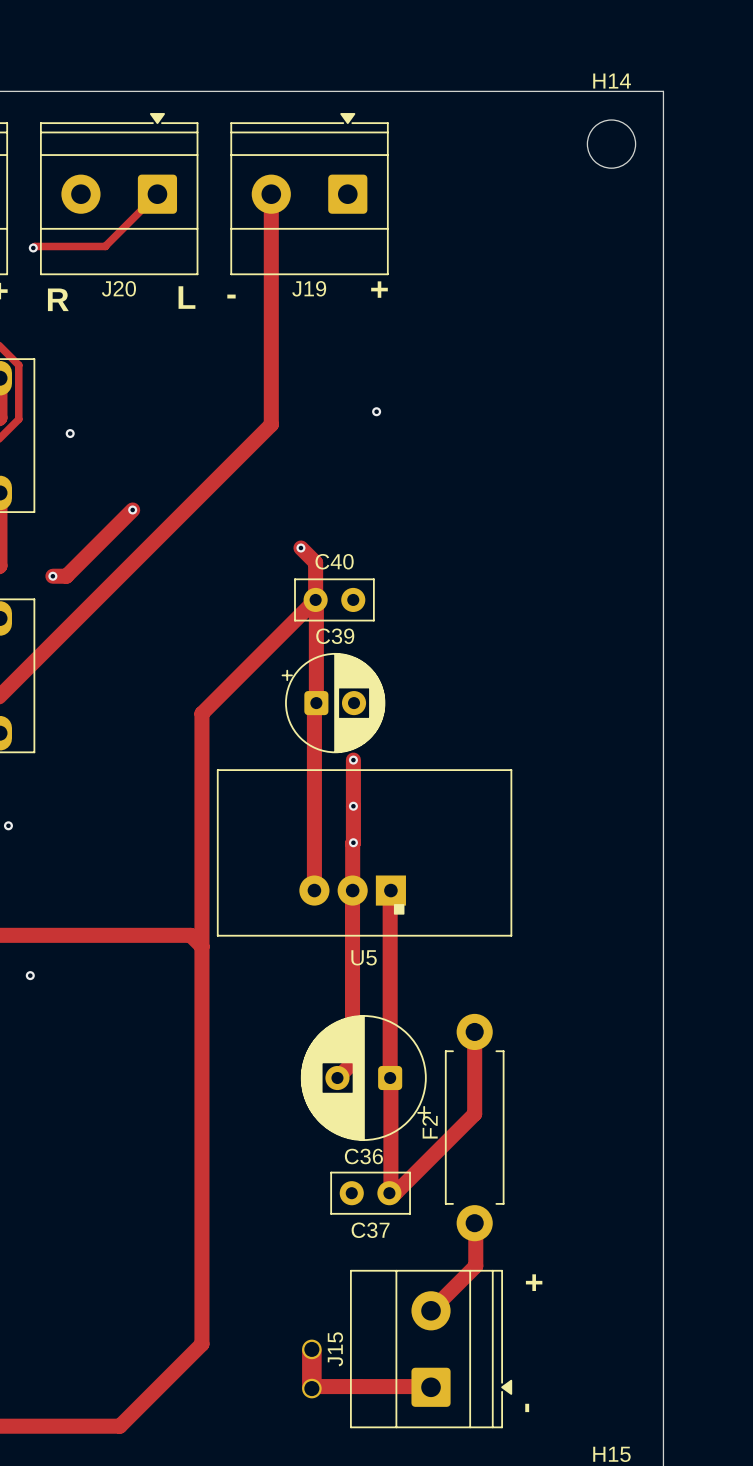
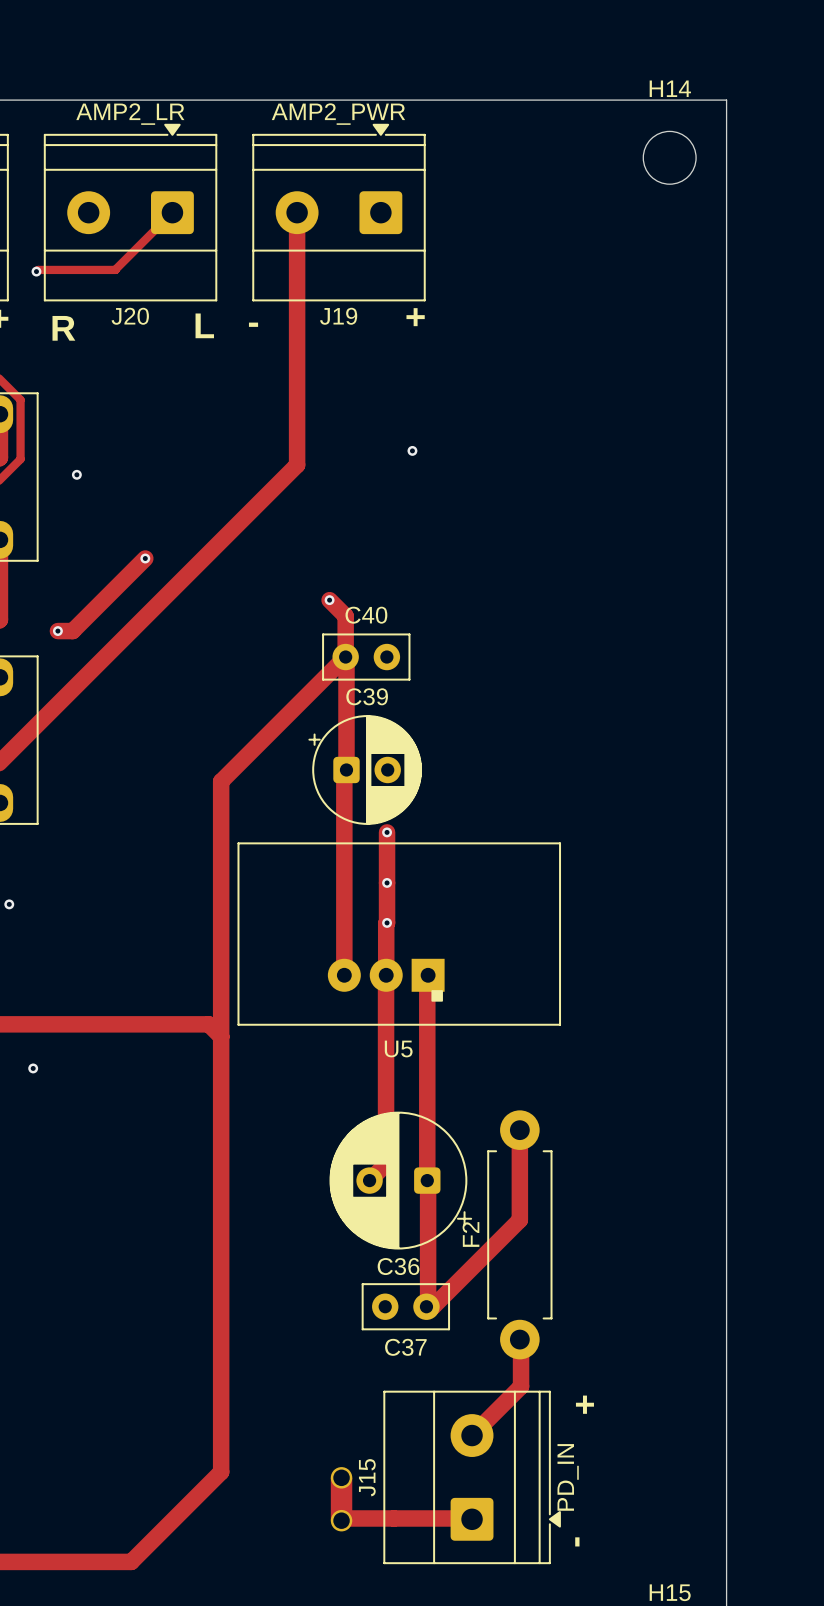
J20 value: none -> AMP2_LR (130, 114)
J19 value: none -> AMP2_PWR (338, 114)
J15 value: none -> PD_IN (568, 1477)

